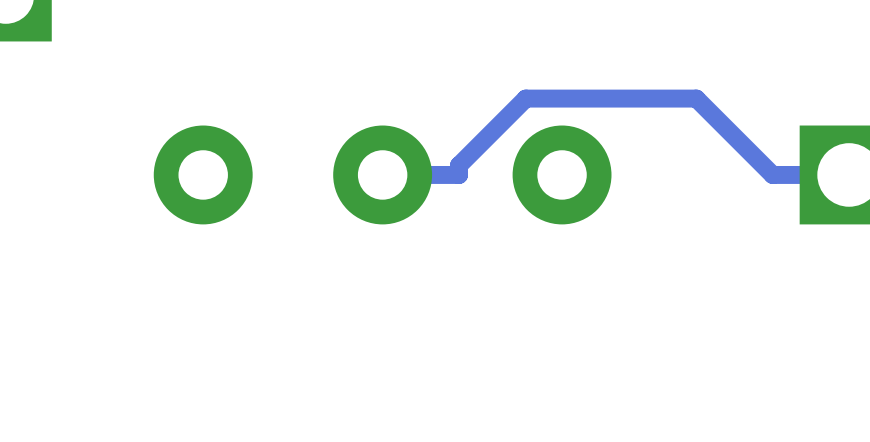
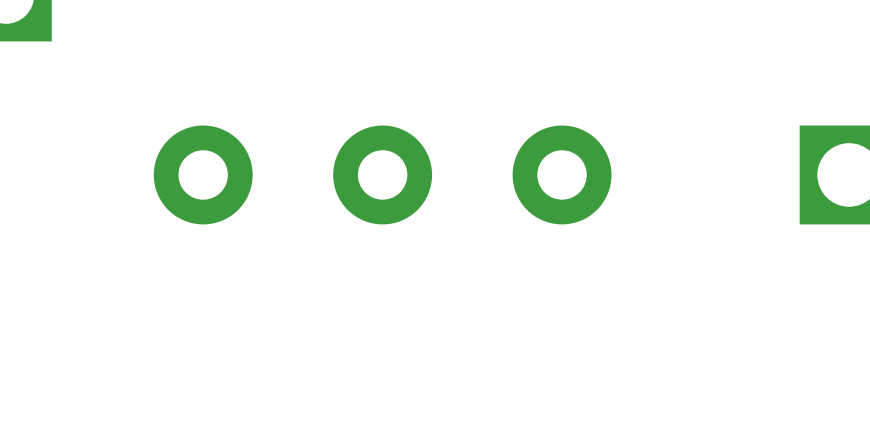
track: (849, 174) (772, 174) (696, 98) (525, 98) (459, 165) (459, 174) (382, 174) -> none

